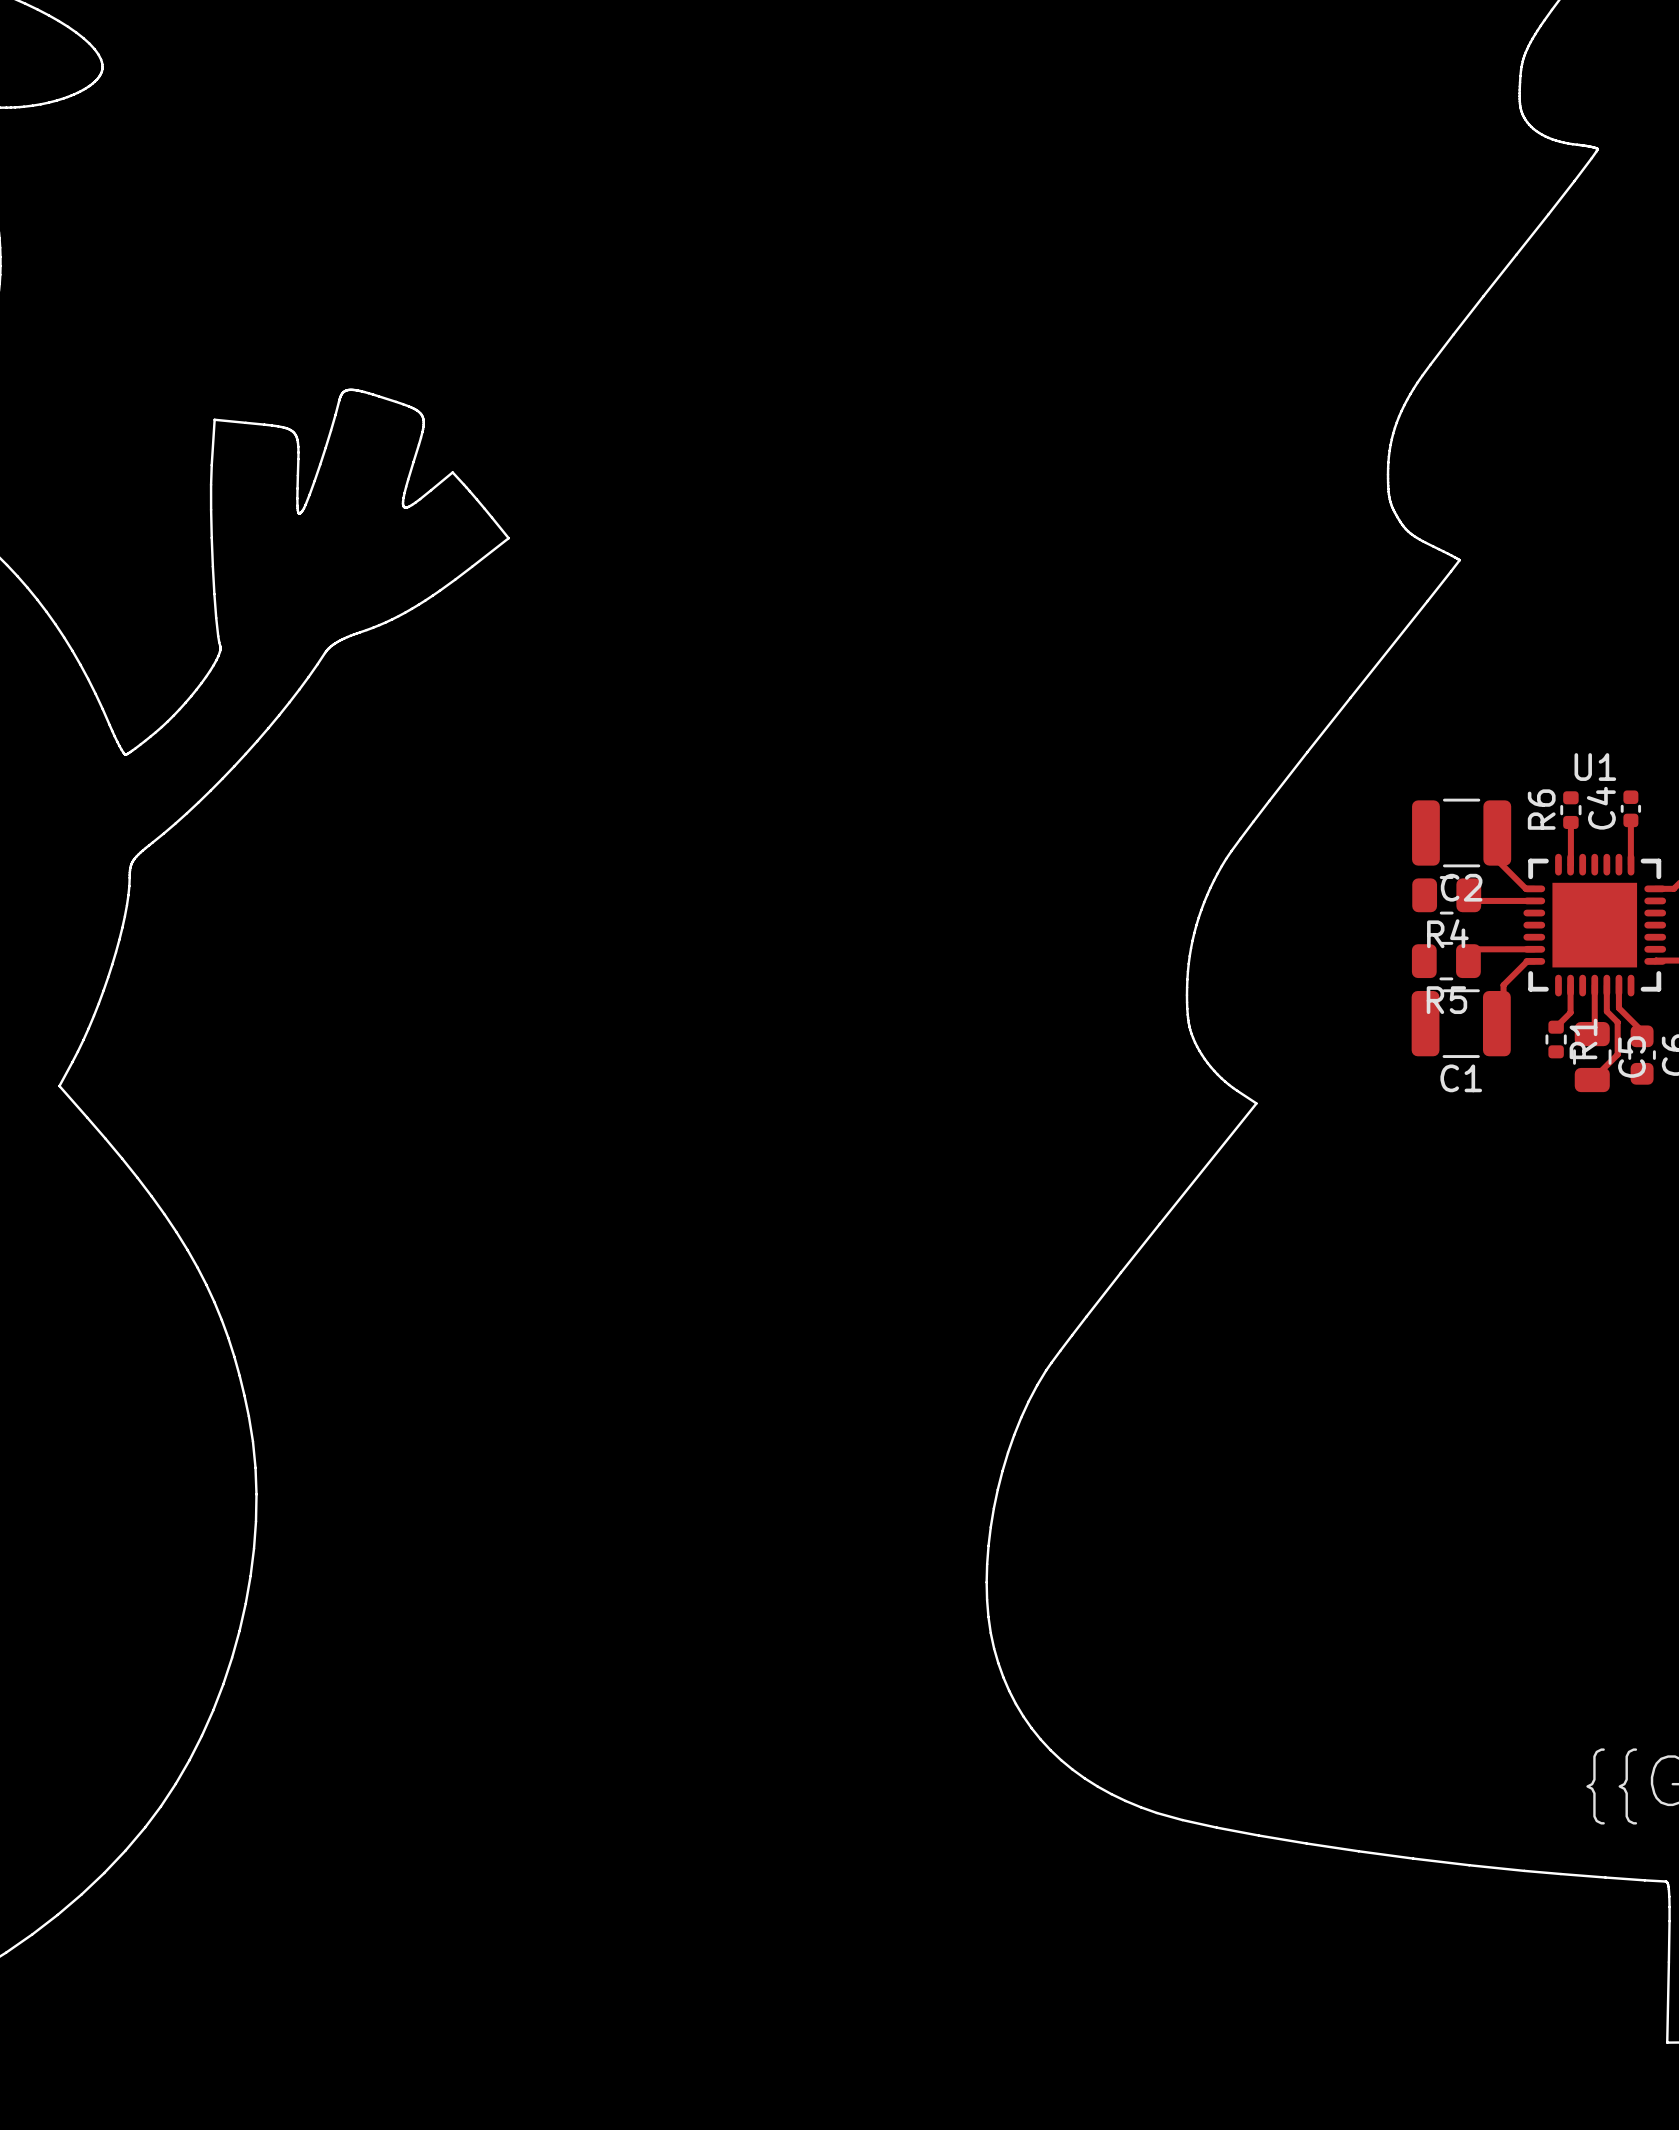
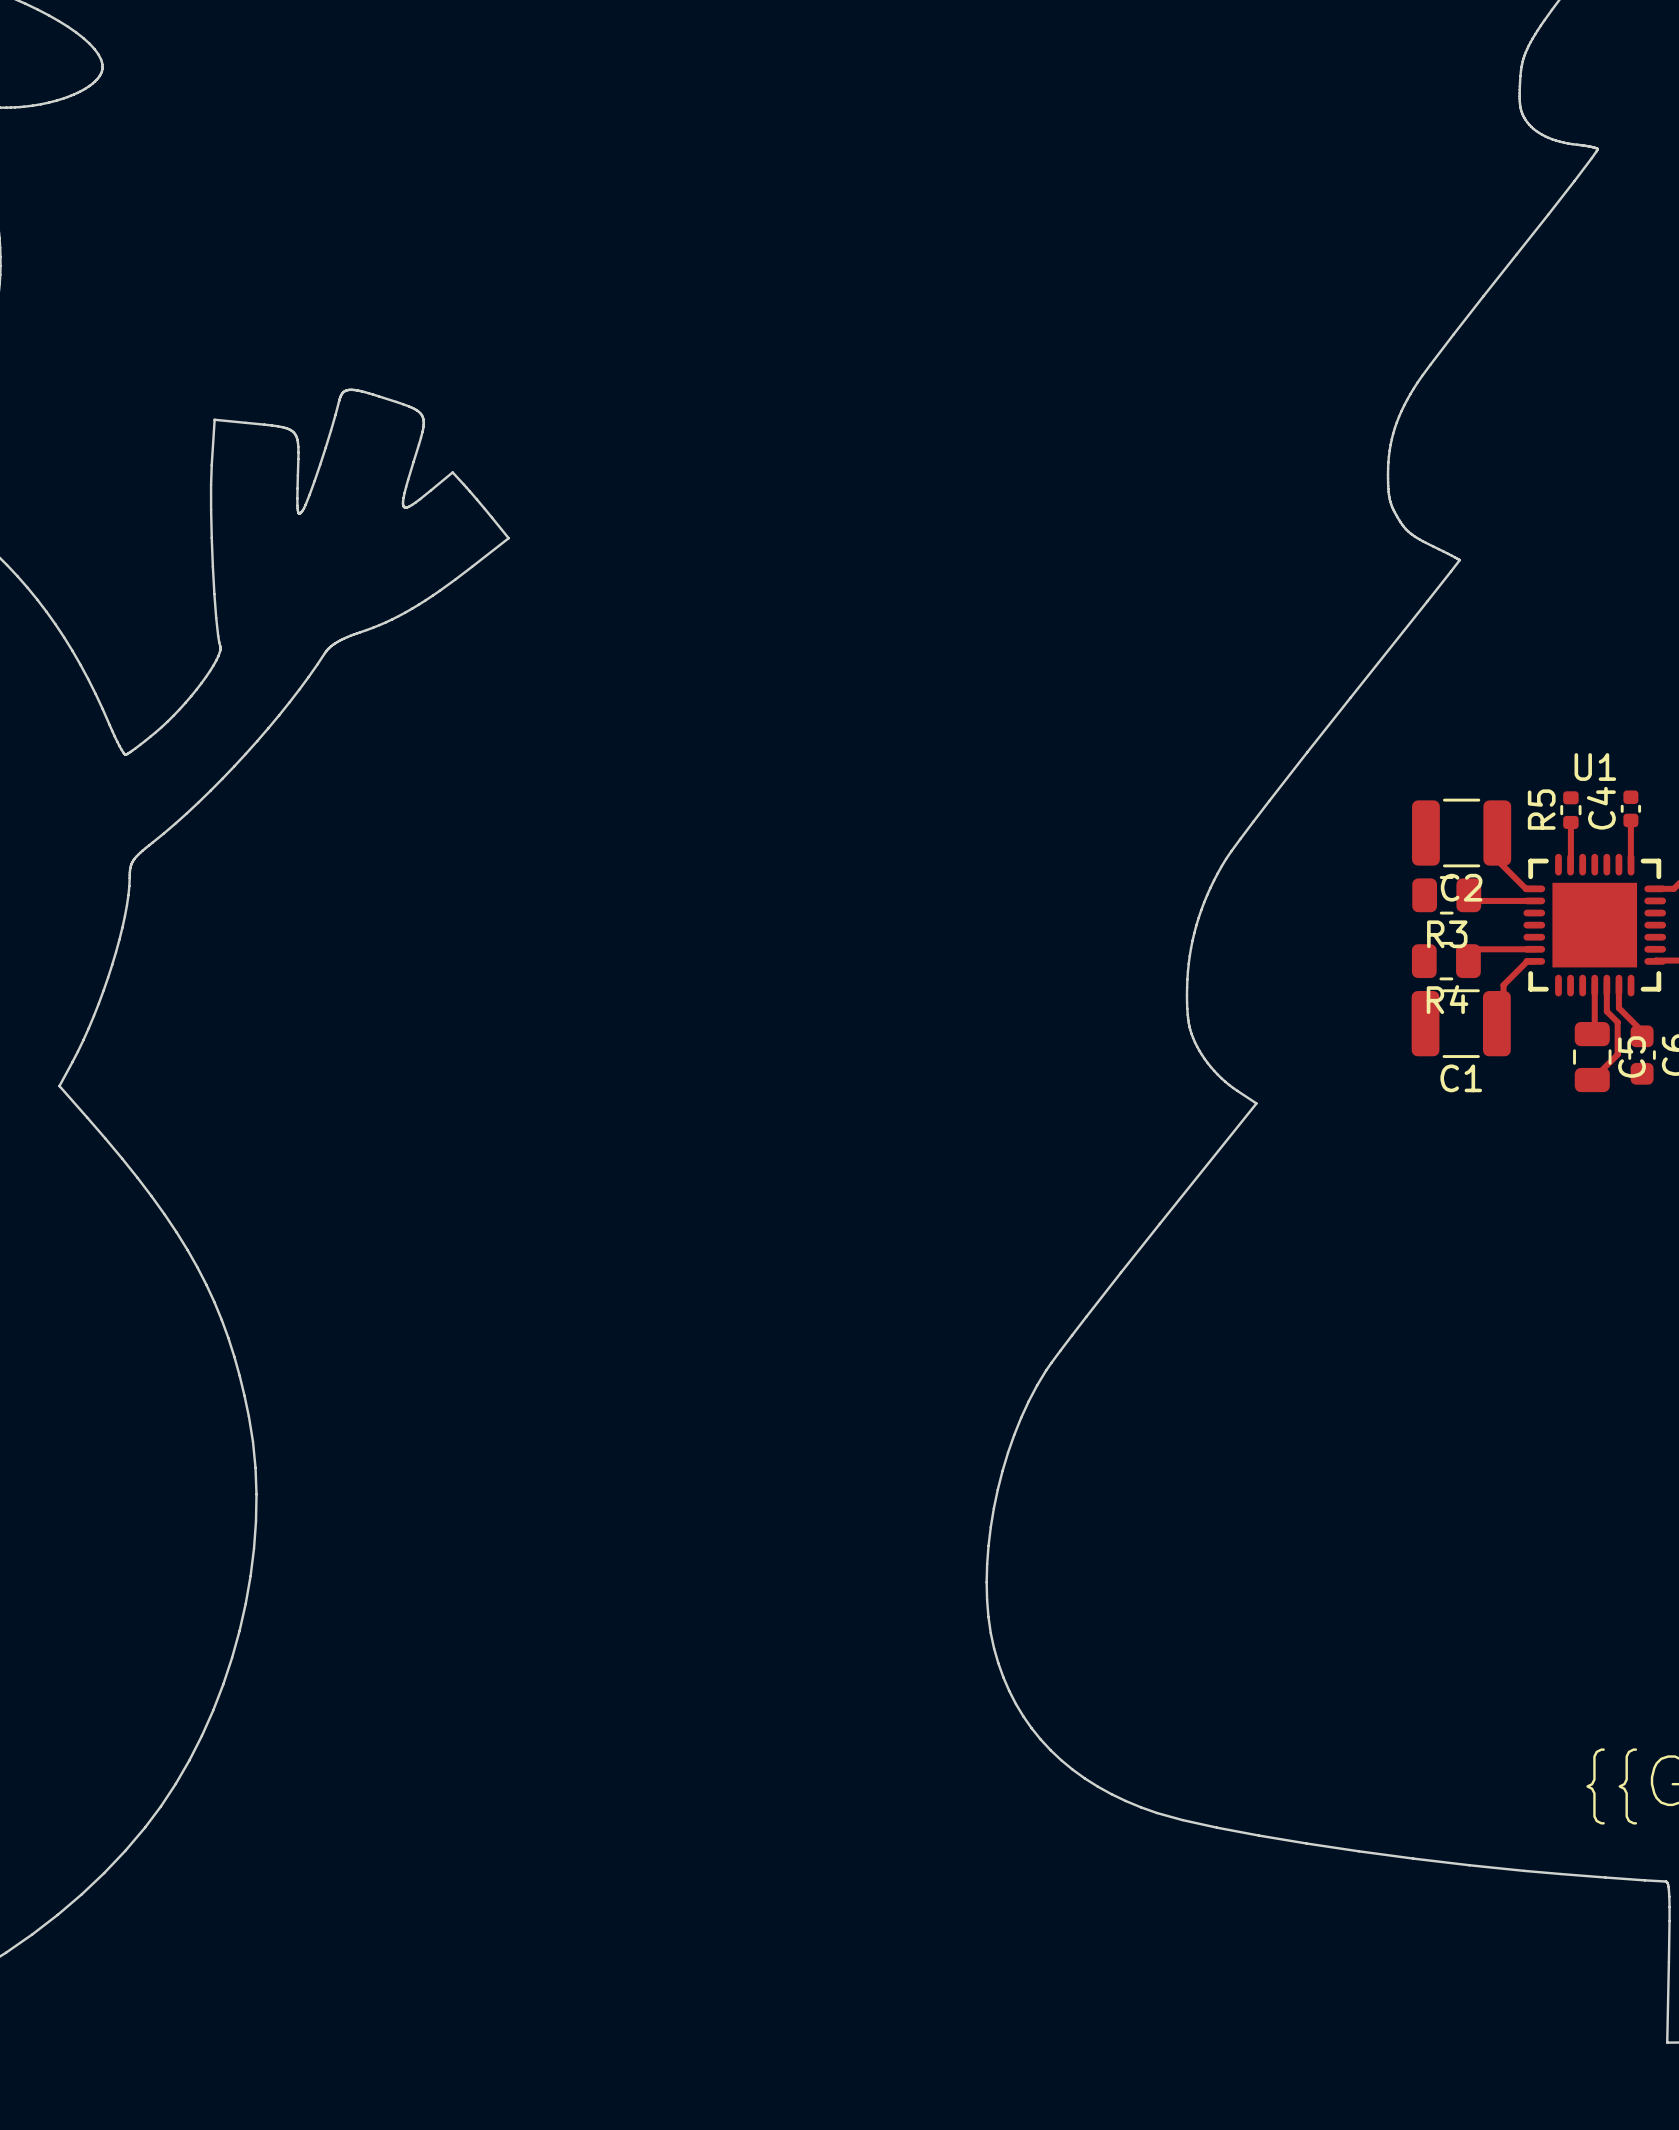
R6 name: R6 (1541, 809) -> R5 (1541, 809)
R4 name: R4 (1447, 933) -> R3 (1447, 934)
track: (1570, 985) (1570, 1012) (1556, 1027) -> none
R5 name: R5 (1446, 1000) -> R4 (1447, 999)
R1: (1556, 1039) -> none

